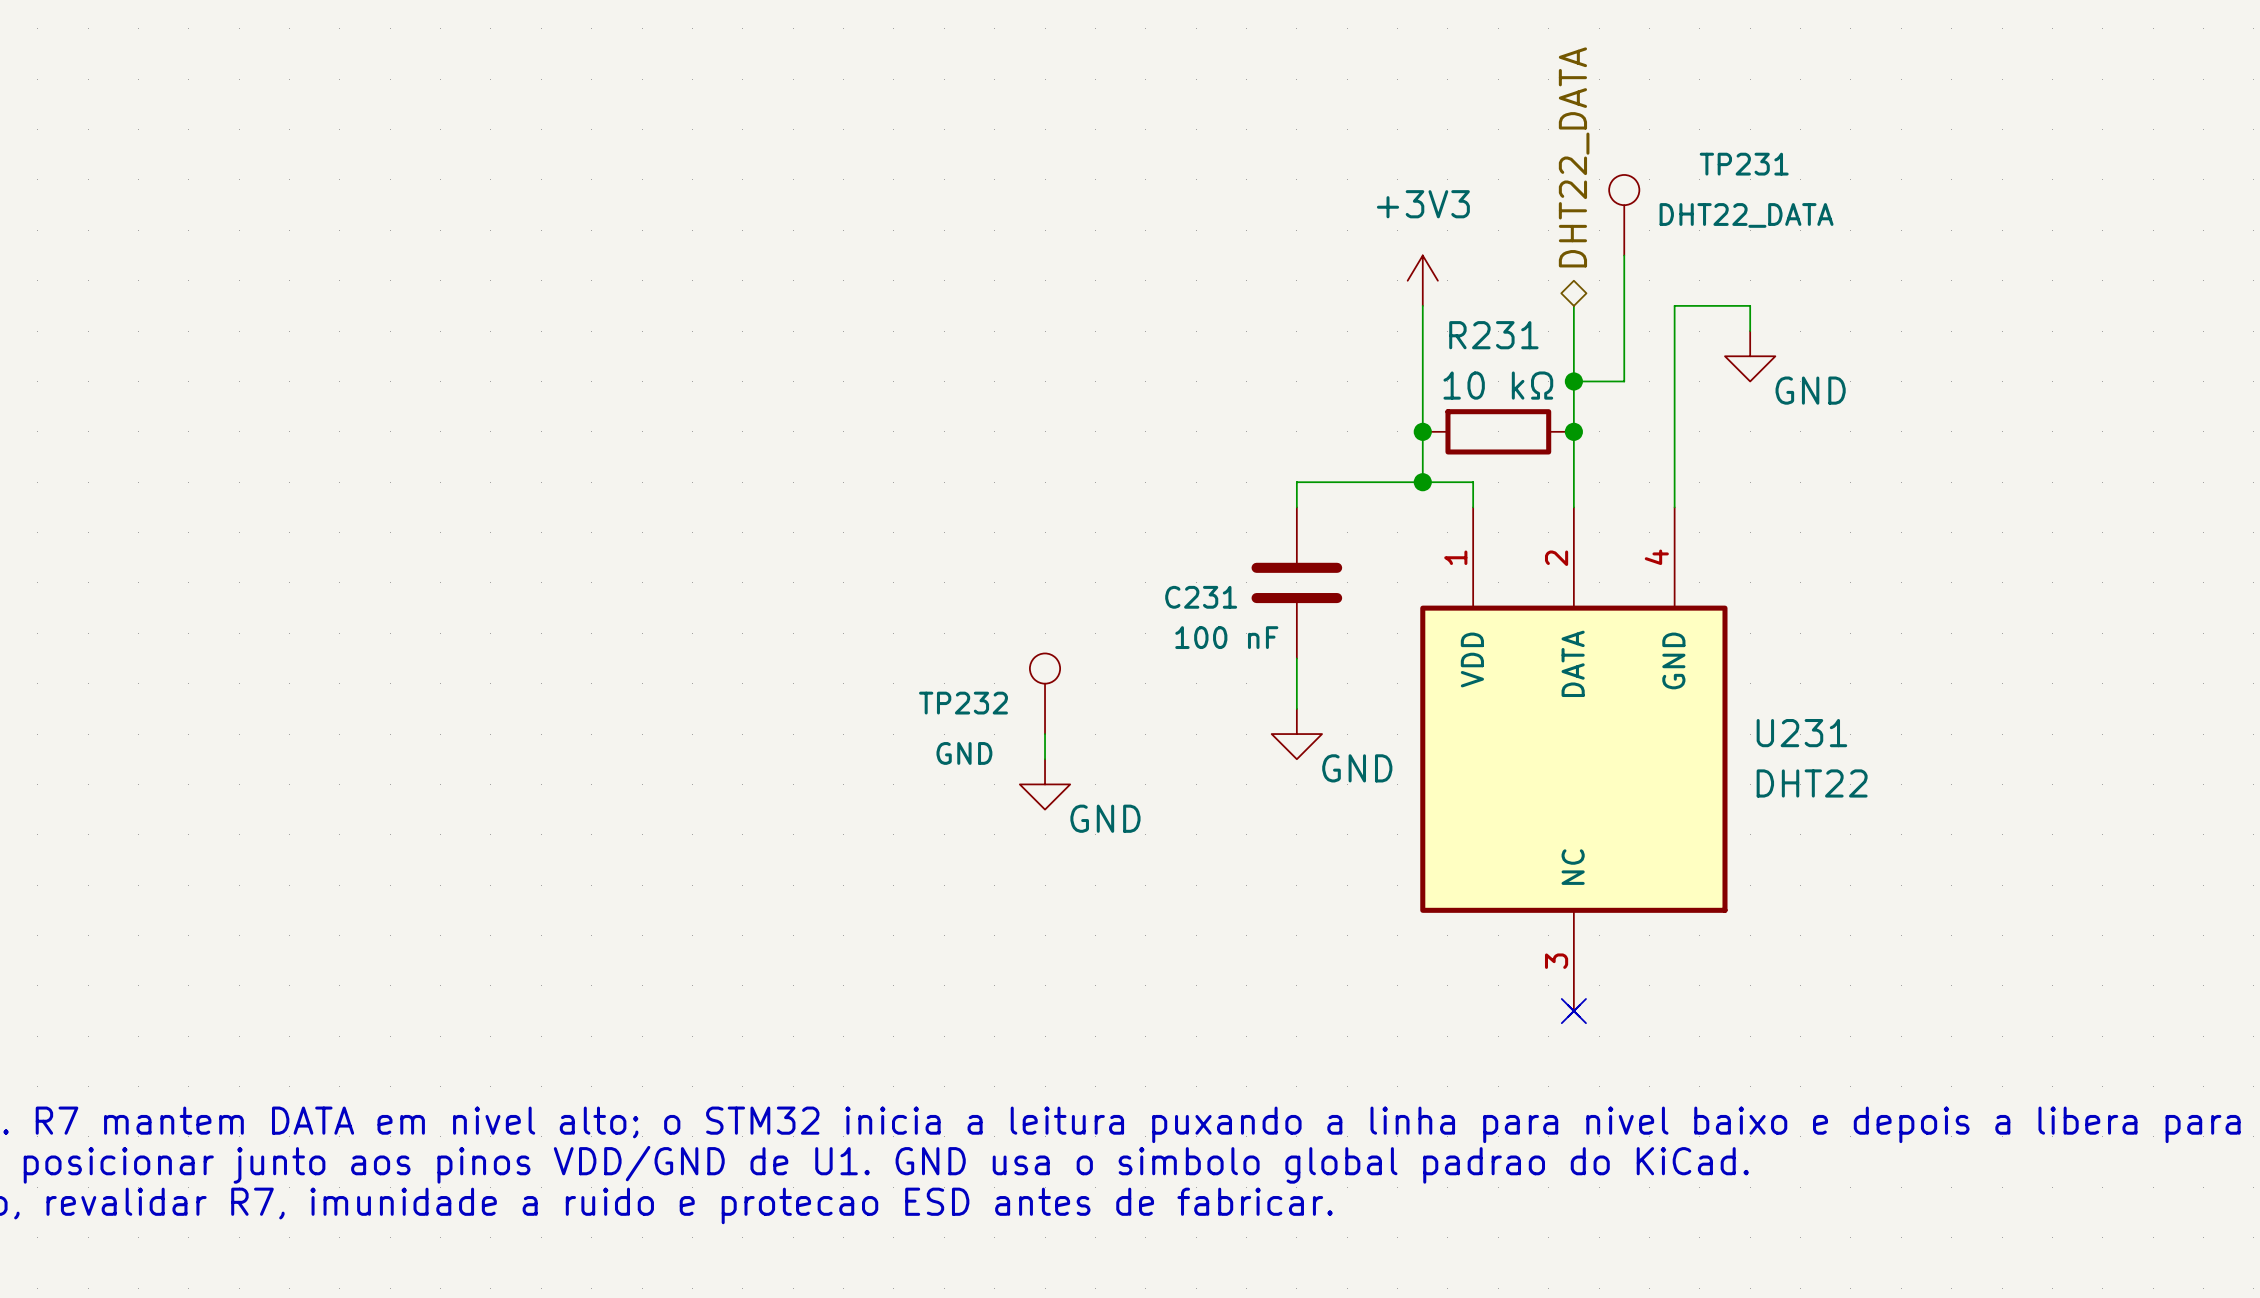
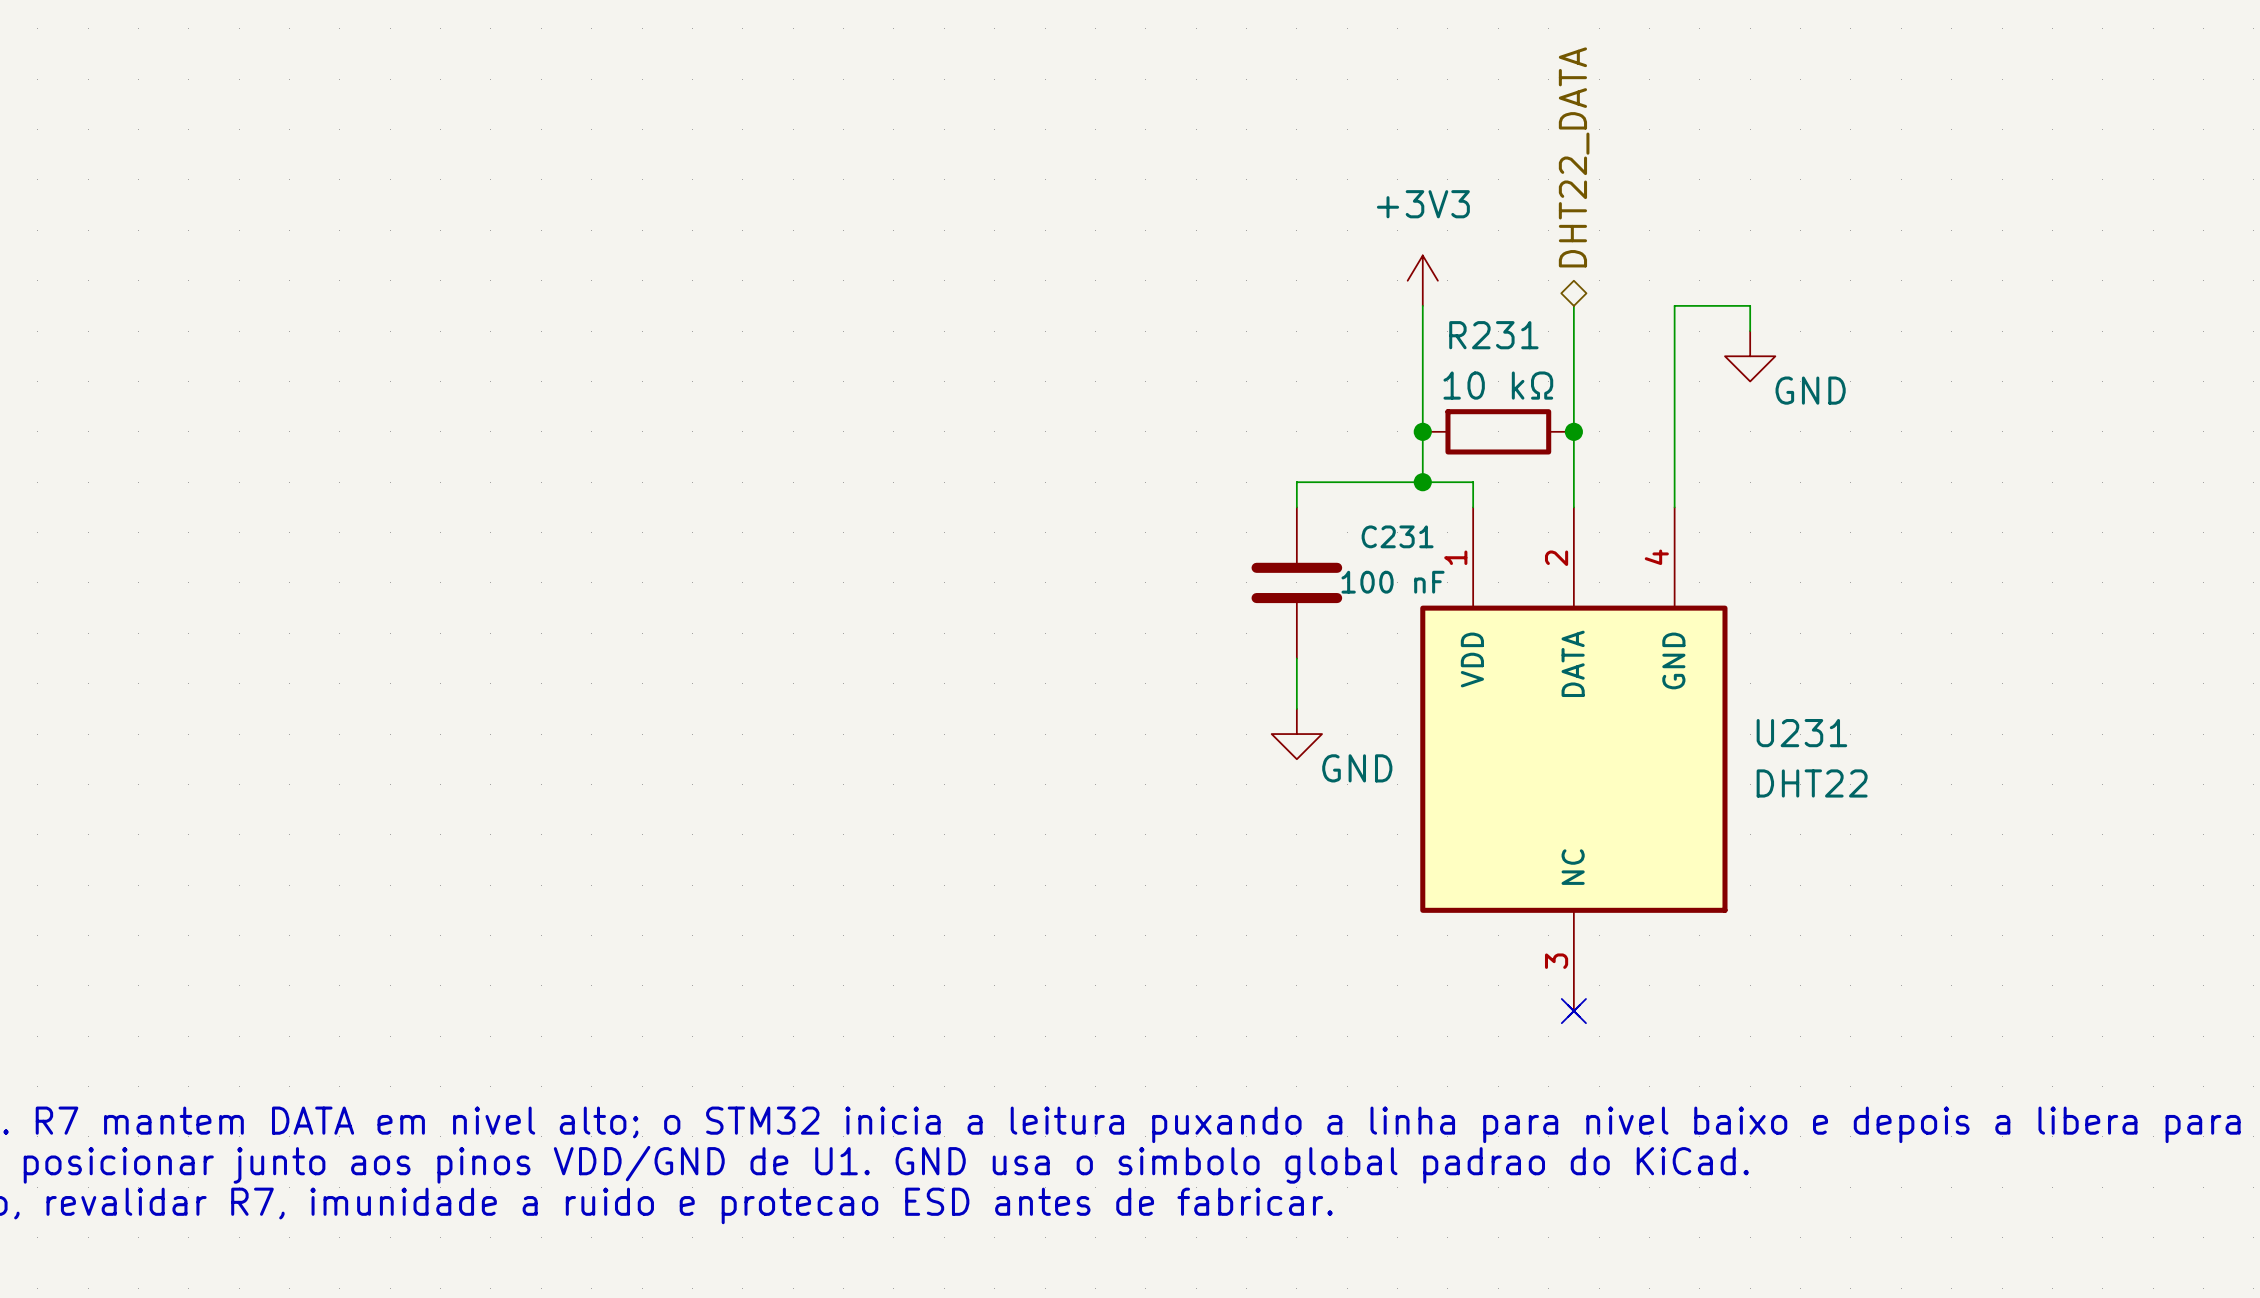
TP231: DHT22_DATA (1624, 215) -> none
wire: (1624, 255) (1624, 381) (1573, 381) -> none
junction: (1573, 381) -> none
C231 name position: C231 (1201, 597) -> C231 (1397, 536)
C231 value position: 100 nF (1226, 637) -> 100 nF (1393, 582)
TP232: GND (1045, 693) -> none
wire: (1045, 734) (1045, 759) -> none
power symbol: GND (1045, 784) -> none

